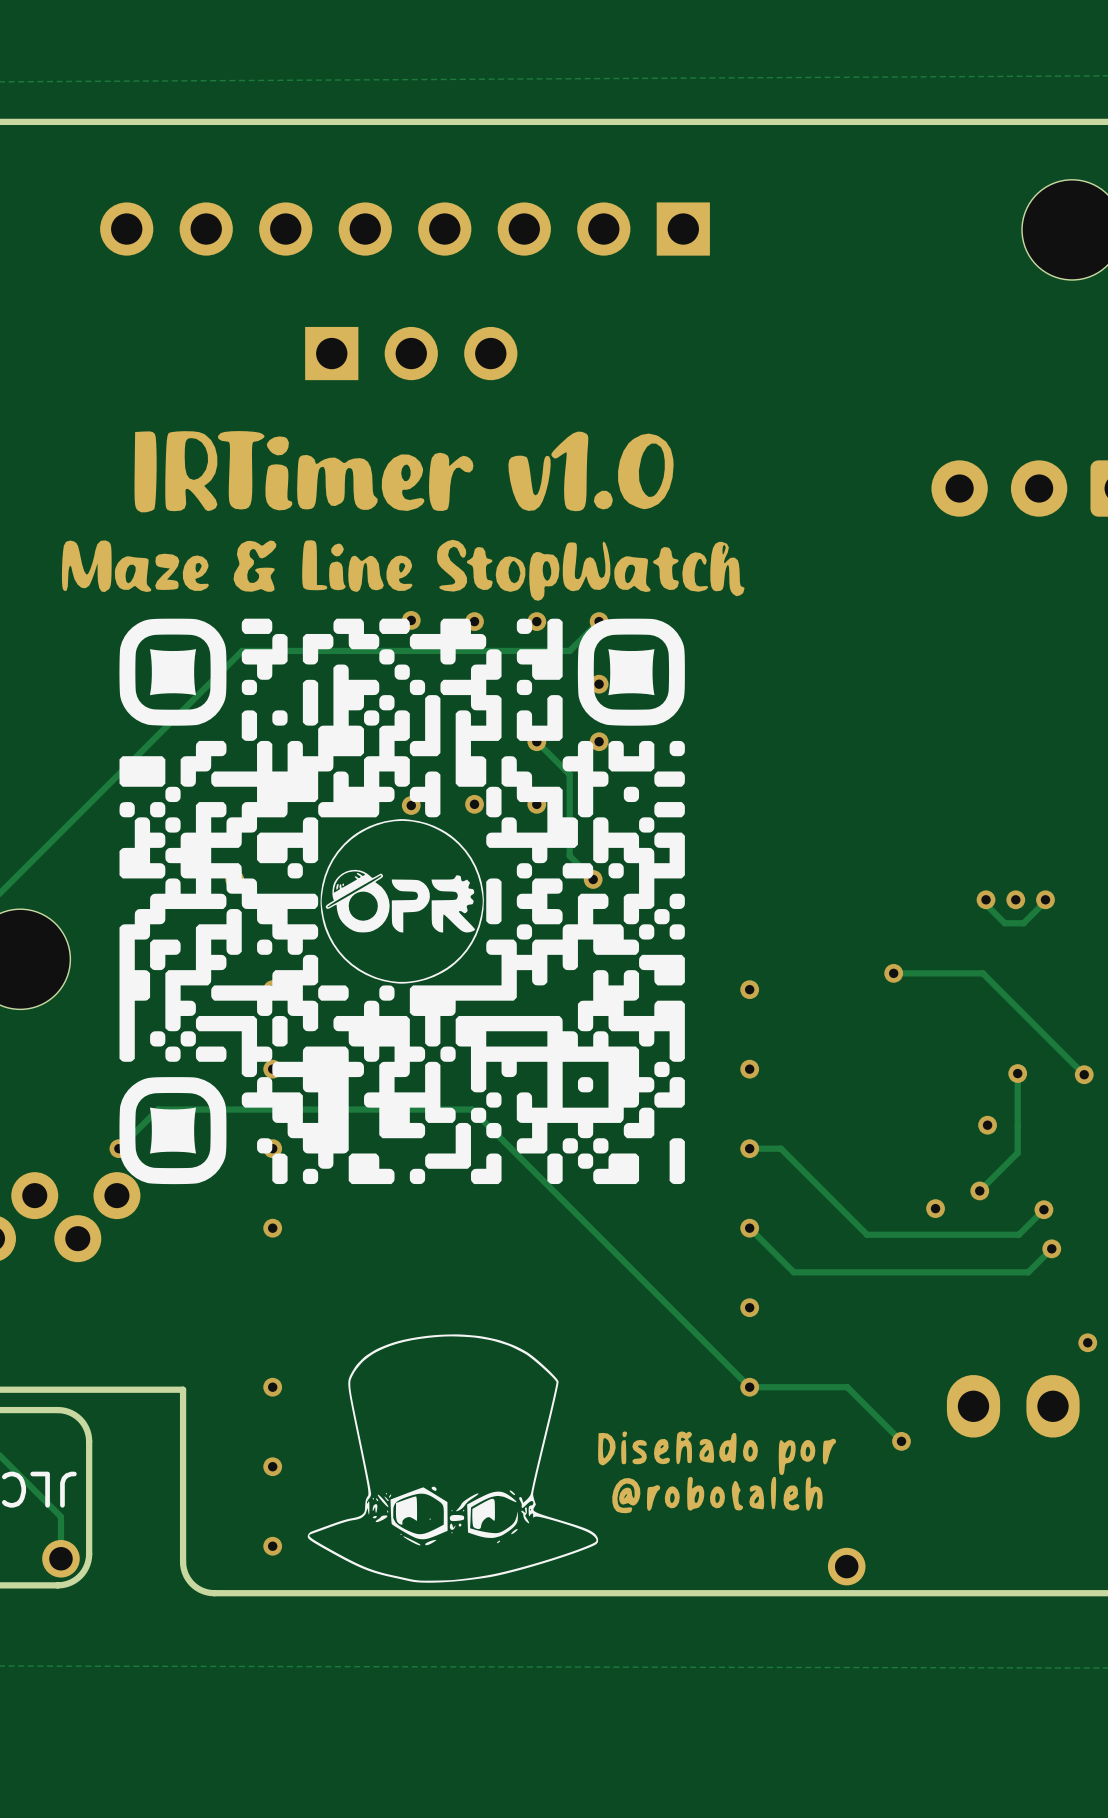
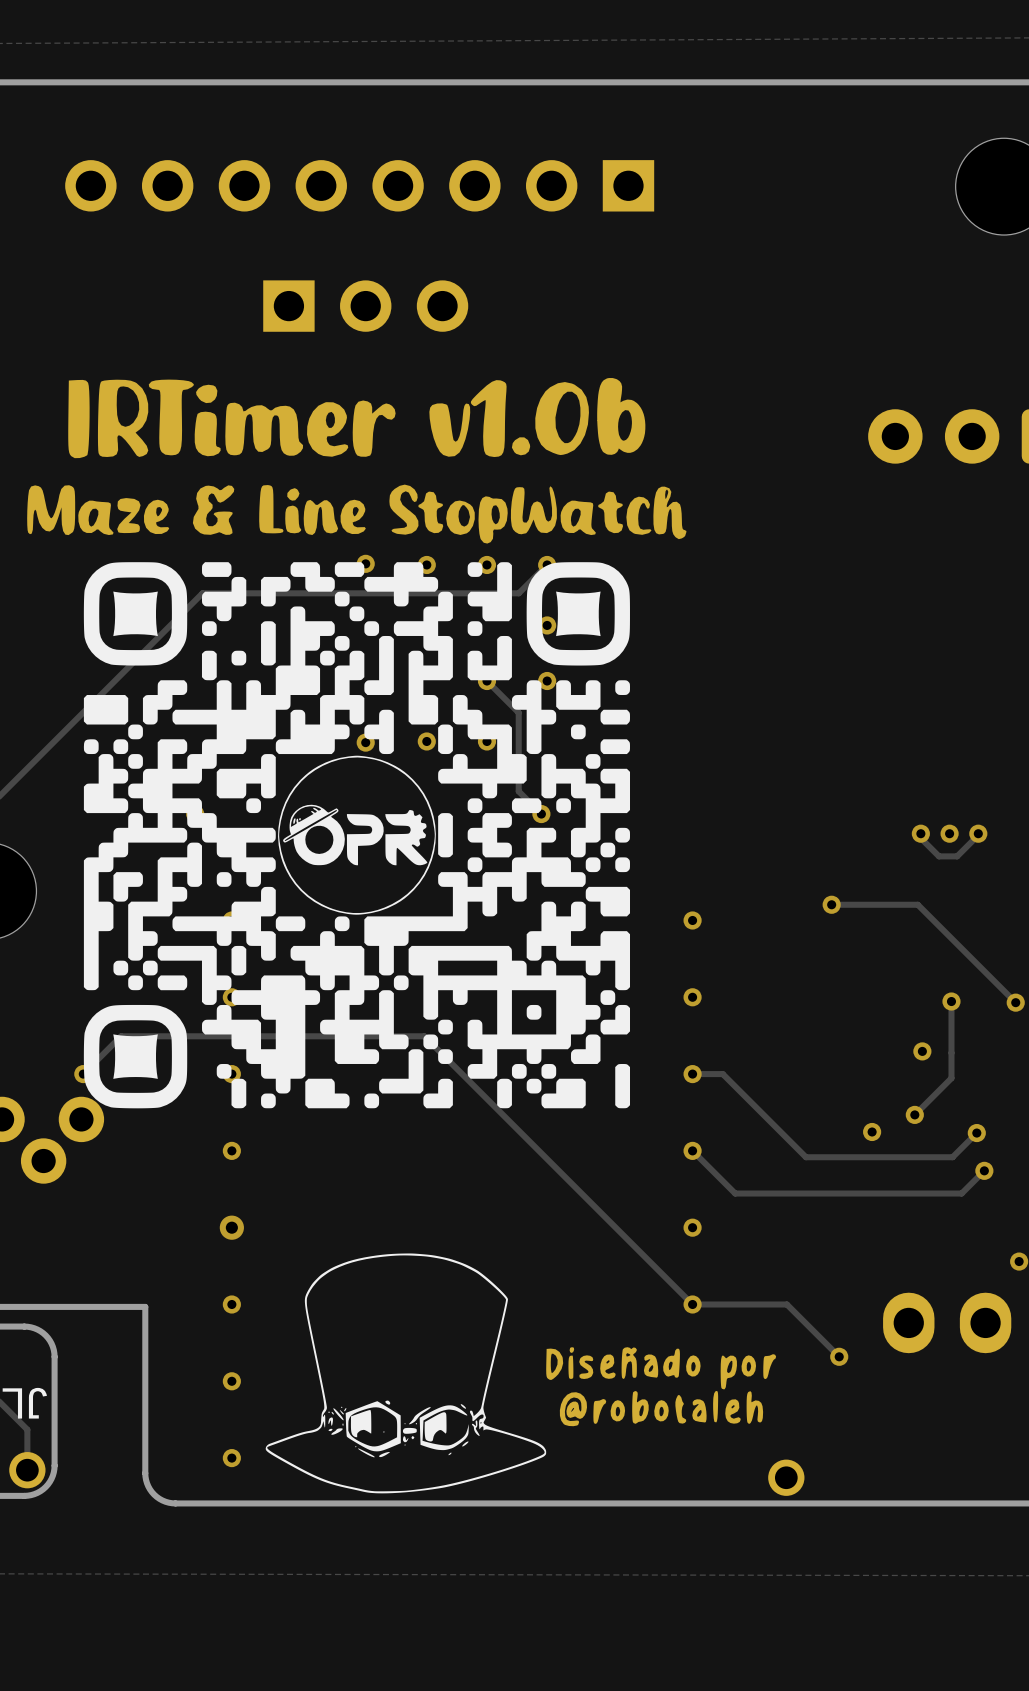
part footprint: [61, 431, 745, 601] -> [27, 378, 687, 544]
via: none -> (231, 1227)

